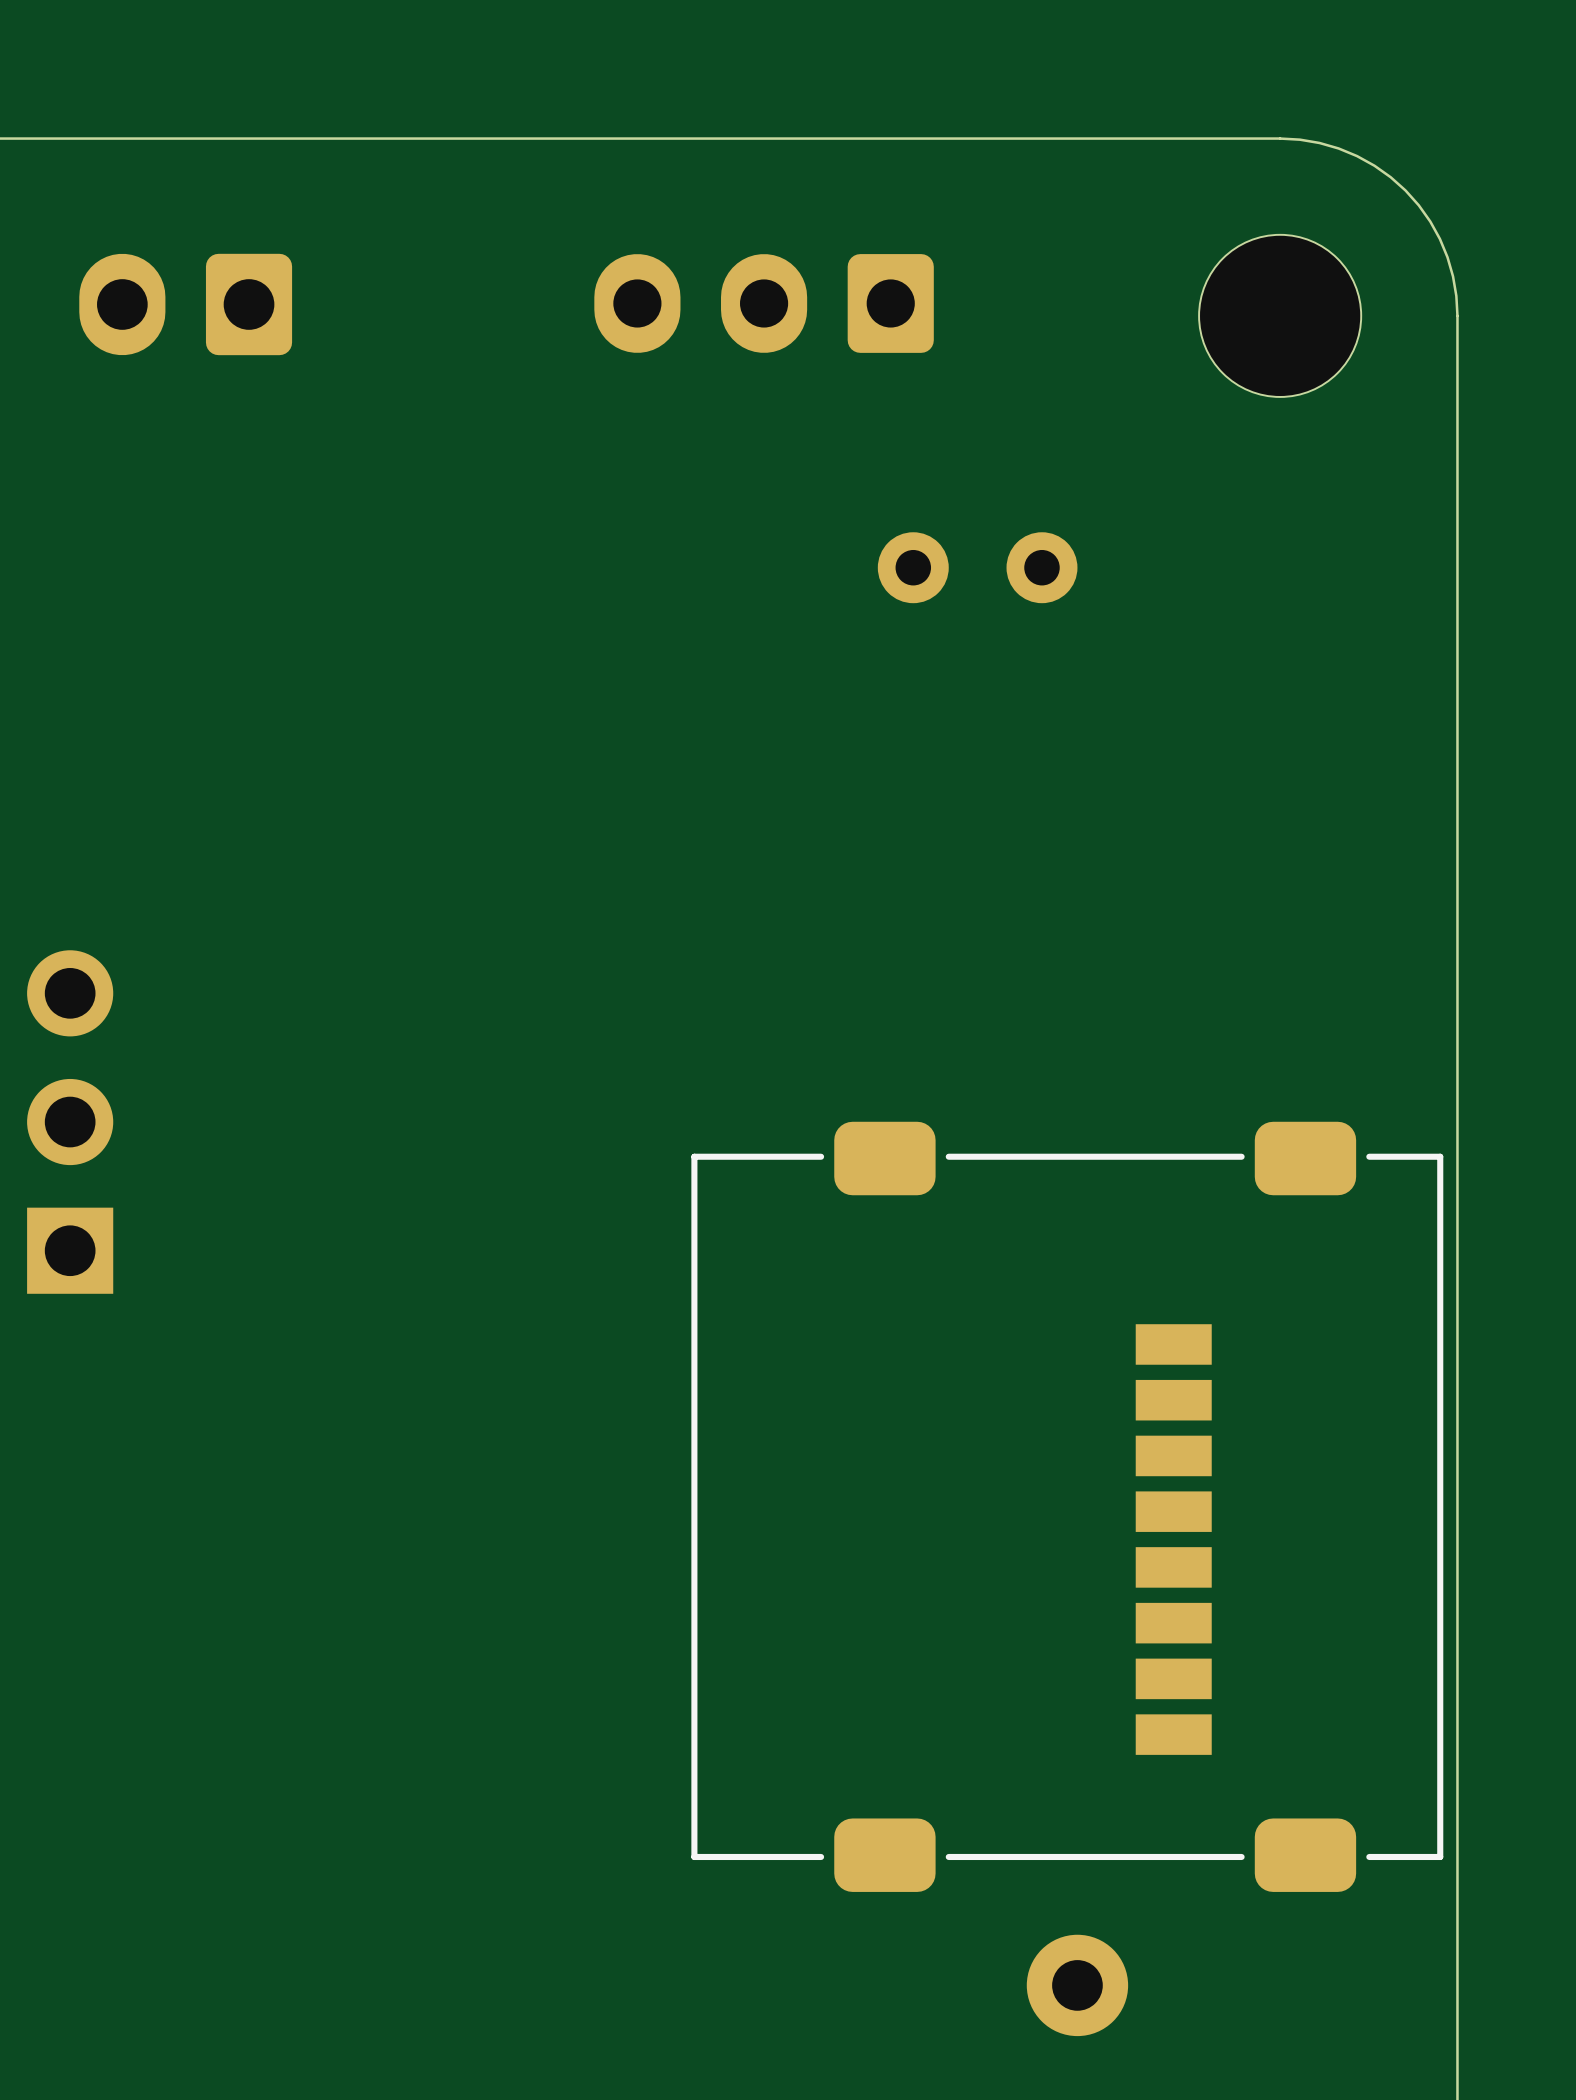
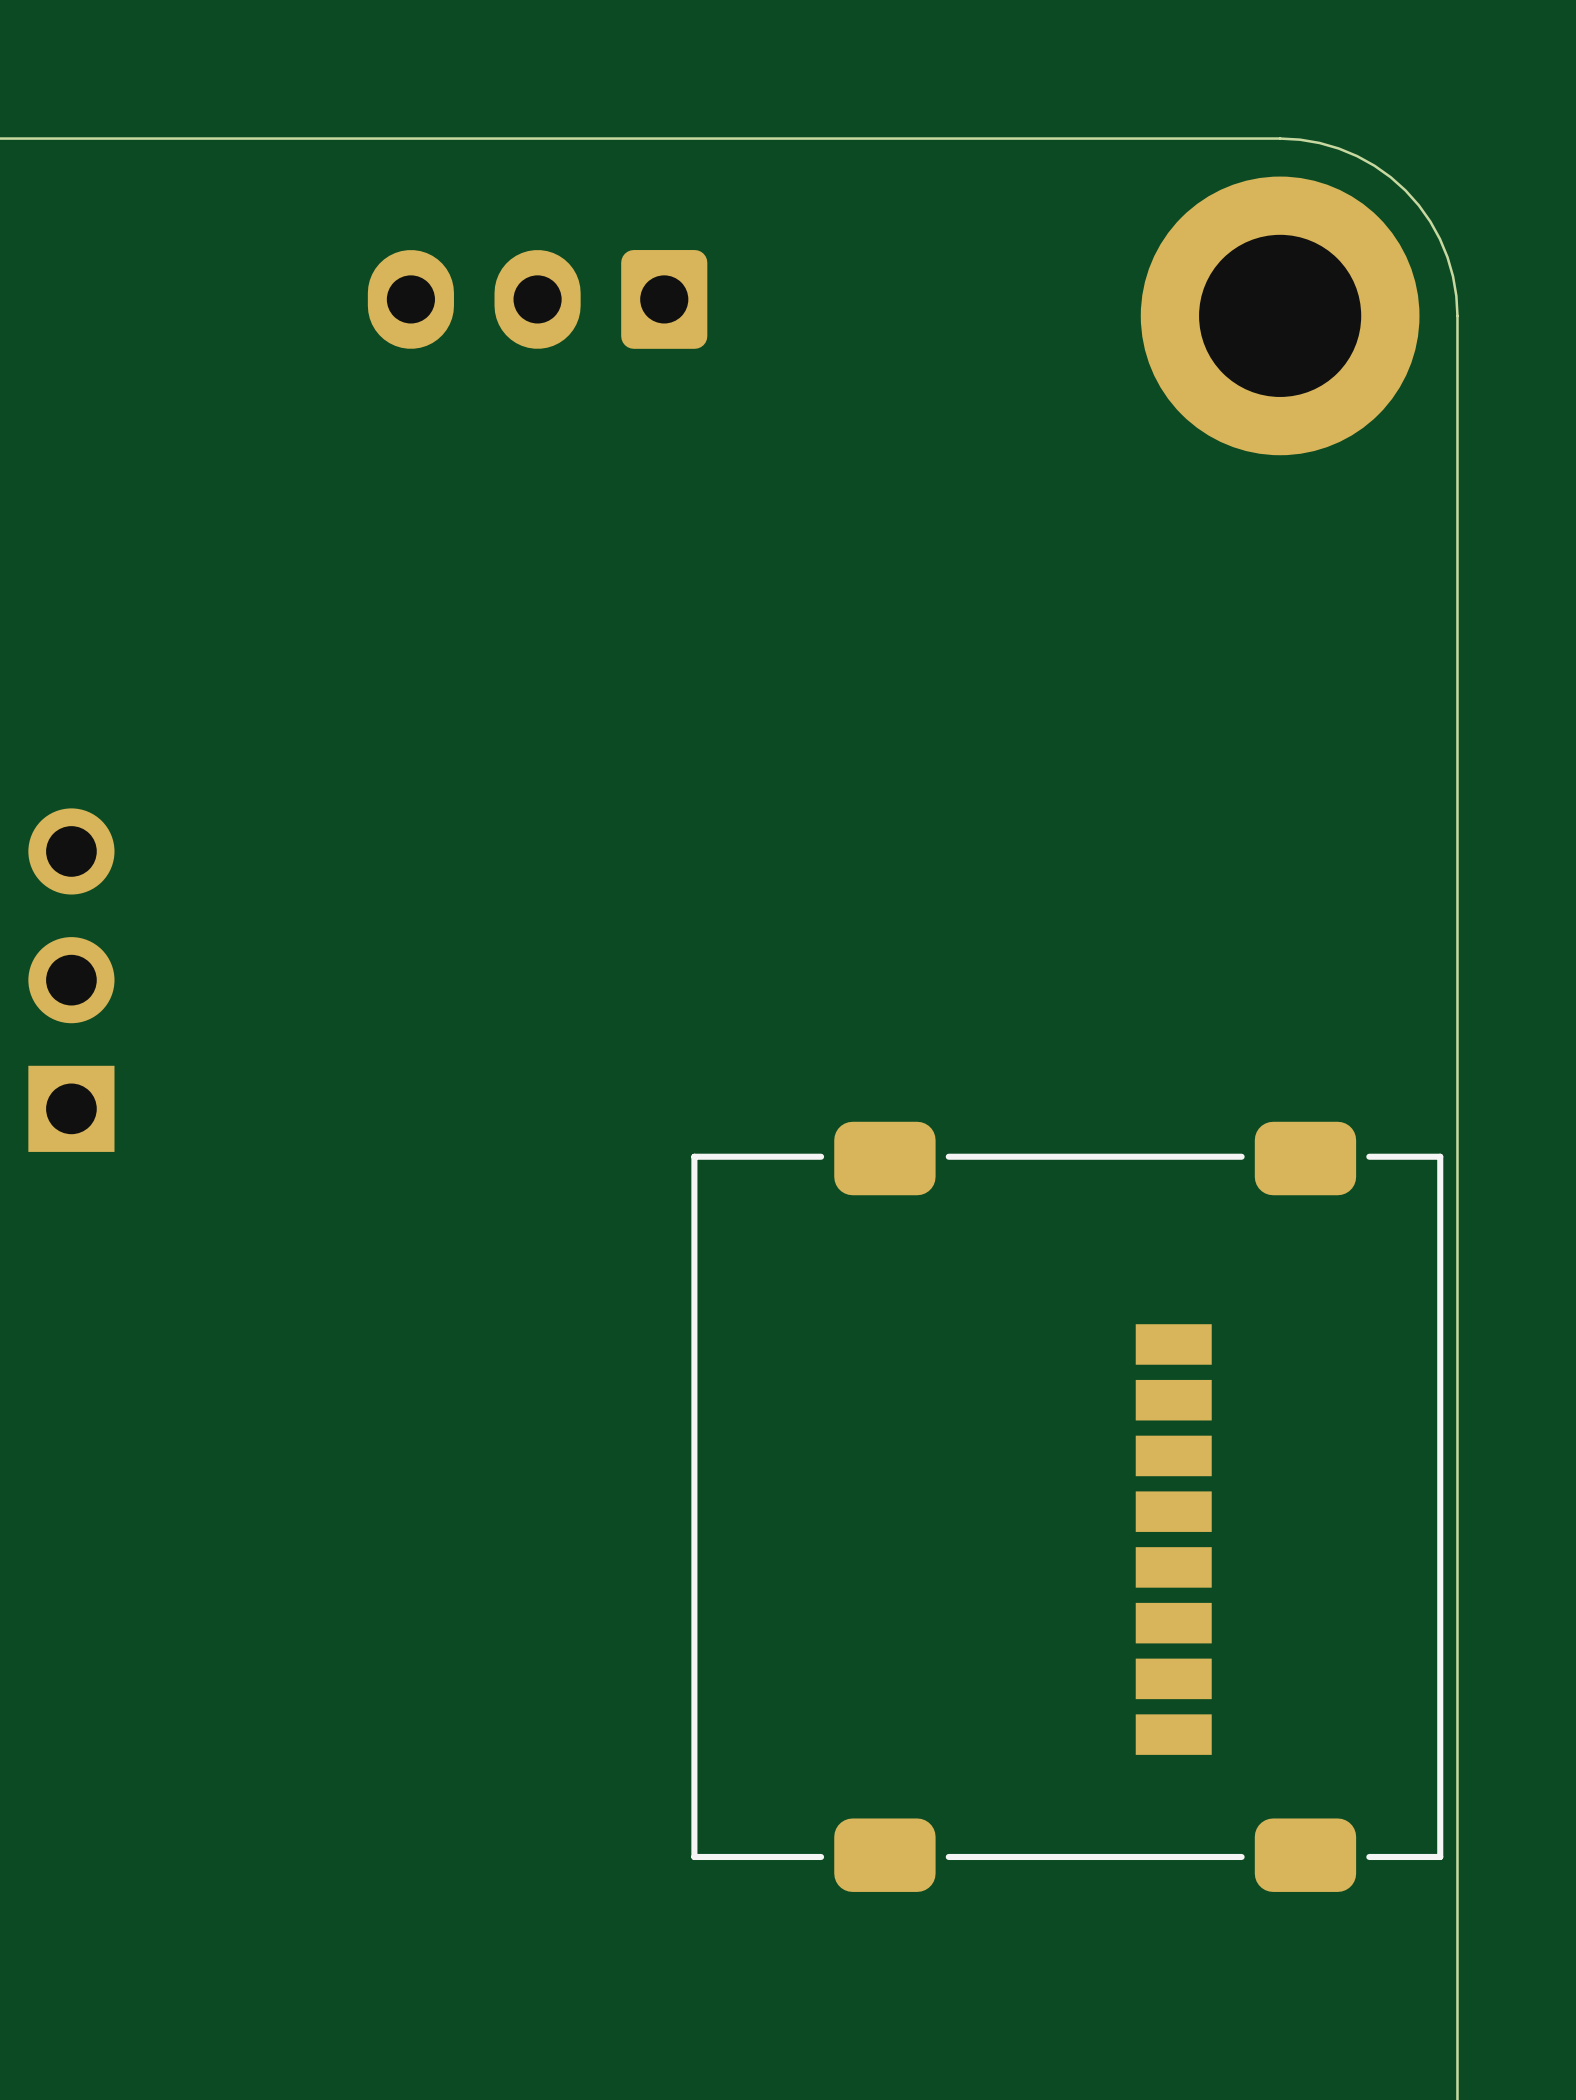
part footprint: [1199, 234, 1362, 397] -> [1140, 176, 1420, 456]
part position: (764, 303) -> (537, 299)
part: (185, 304) -> none
part: (977, 567) -> none
part position: (70, 1122) -> (71, 980)
part: (1077, 1985) -> none

